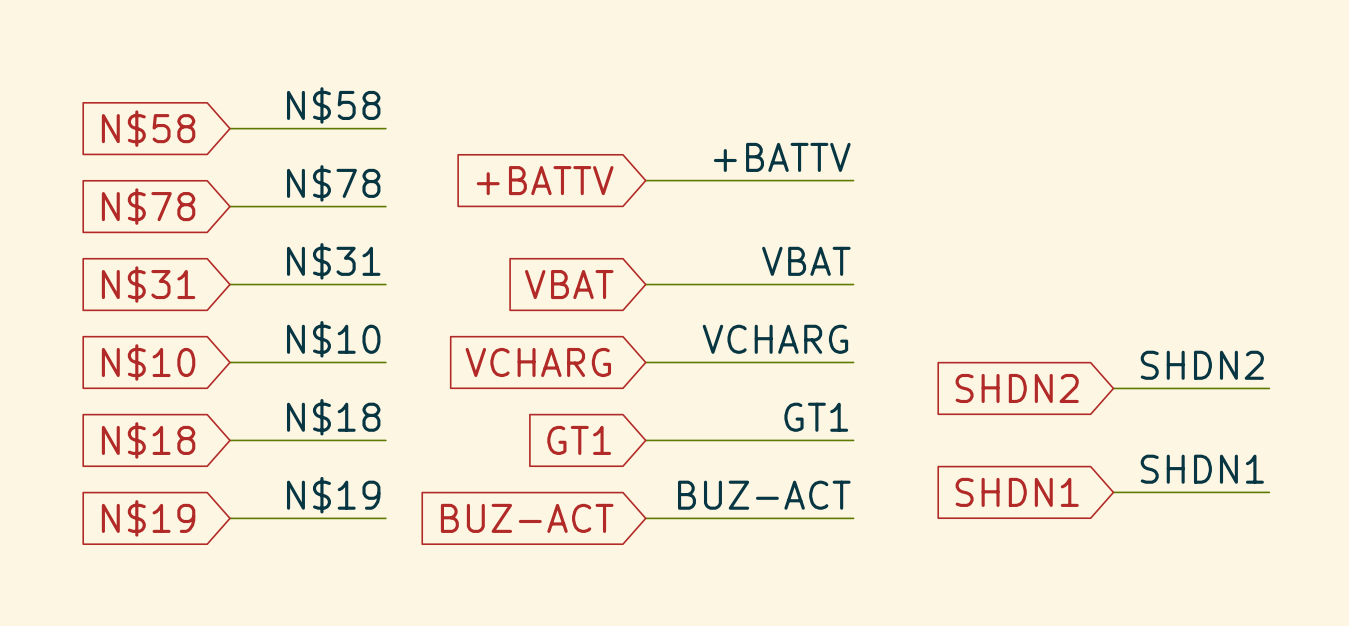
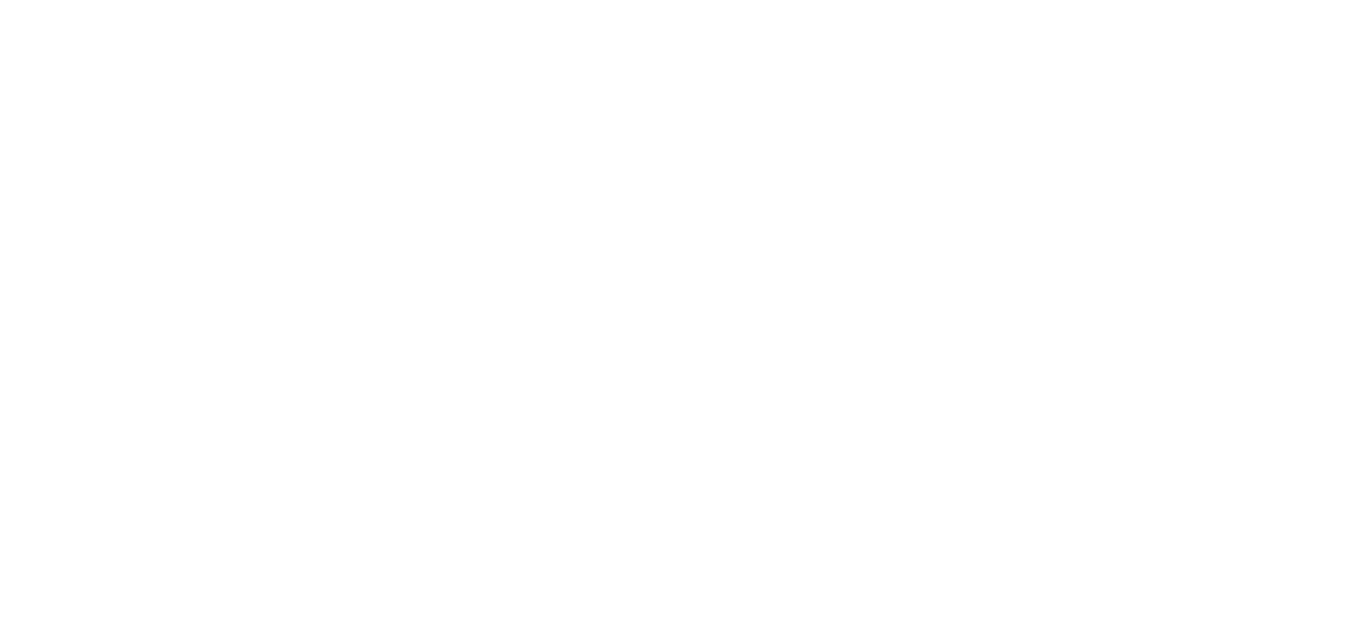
label: N$58 (333, 105) -> none
global label: N$58 (148, 128) -> none
wire: (229, 128) (385, 128) -> none
label: +BATTV (782, 157) -> none
global label: +BATTV (545, 180) -> none
wire: (645, 180) (853, 180) -> none
label: N$78 (333, 183) -> none
global label: N$78 (148, 206) -> none
wire: (229, 206) (385, 206) -> none
label: N$31 (333, 261) -> none
label: VBAT (806, 261) -> none
global label: N$31 (148, 284) -> none
wire: (229, 284) (385, 284) -> none
global label: VBAT (569, 284) -> none
wire: (645, 284) (853, 284) -> none
label: N$10 (333, 339) -> none
label: VCHARG (775, 339) -> none
global label: N$10 (148, 362) -> none
wire: (229, 362) (385, 362) -> none
global label: VCHARG (538, 362) -> none
wire: (645, 362) (853, 362) -> none
label: SHDN2 (1202, 365) -> none
global label: SHDN2 (1017, 388) -> none
wire: (1113, 388) (1269, 388) -> none
label: N$18 (333, 417) -> none
label: GT1 (816, 417) -> none
global label: N$18 (148, 440) -> none
wire: (229, 440) (385, 440) -> none
global label: GT1 (579, 440) -> none
wire: (645, 440) (853, 440) -> none
label: SHDN1 (1202, 469) -> none
global label: SHDN1 (1017, 492) -> none
wire: (1113, 492) (1269, 492) -> none
label: N$19 (333, 495) -> none
label: BUZ-ACT (764, 495) -> none
global label: N$19 (148, 518) -> none
wire: (229, 518) (385, 518) -> none
global label: BUZ-ACT (527, 518) -> none
wire: (645, 518) (853, 518) -> none

